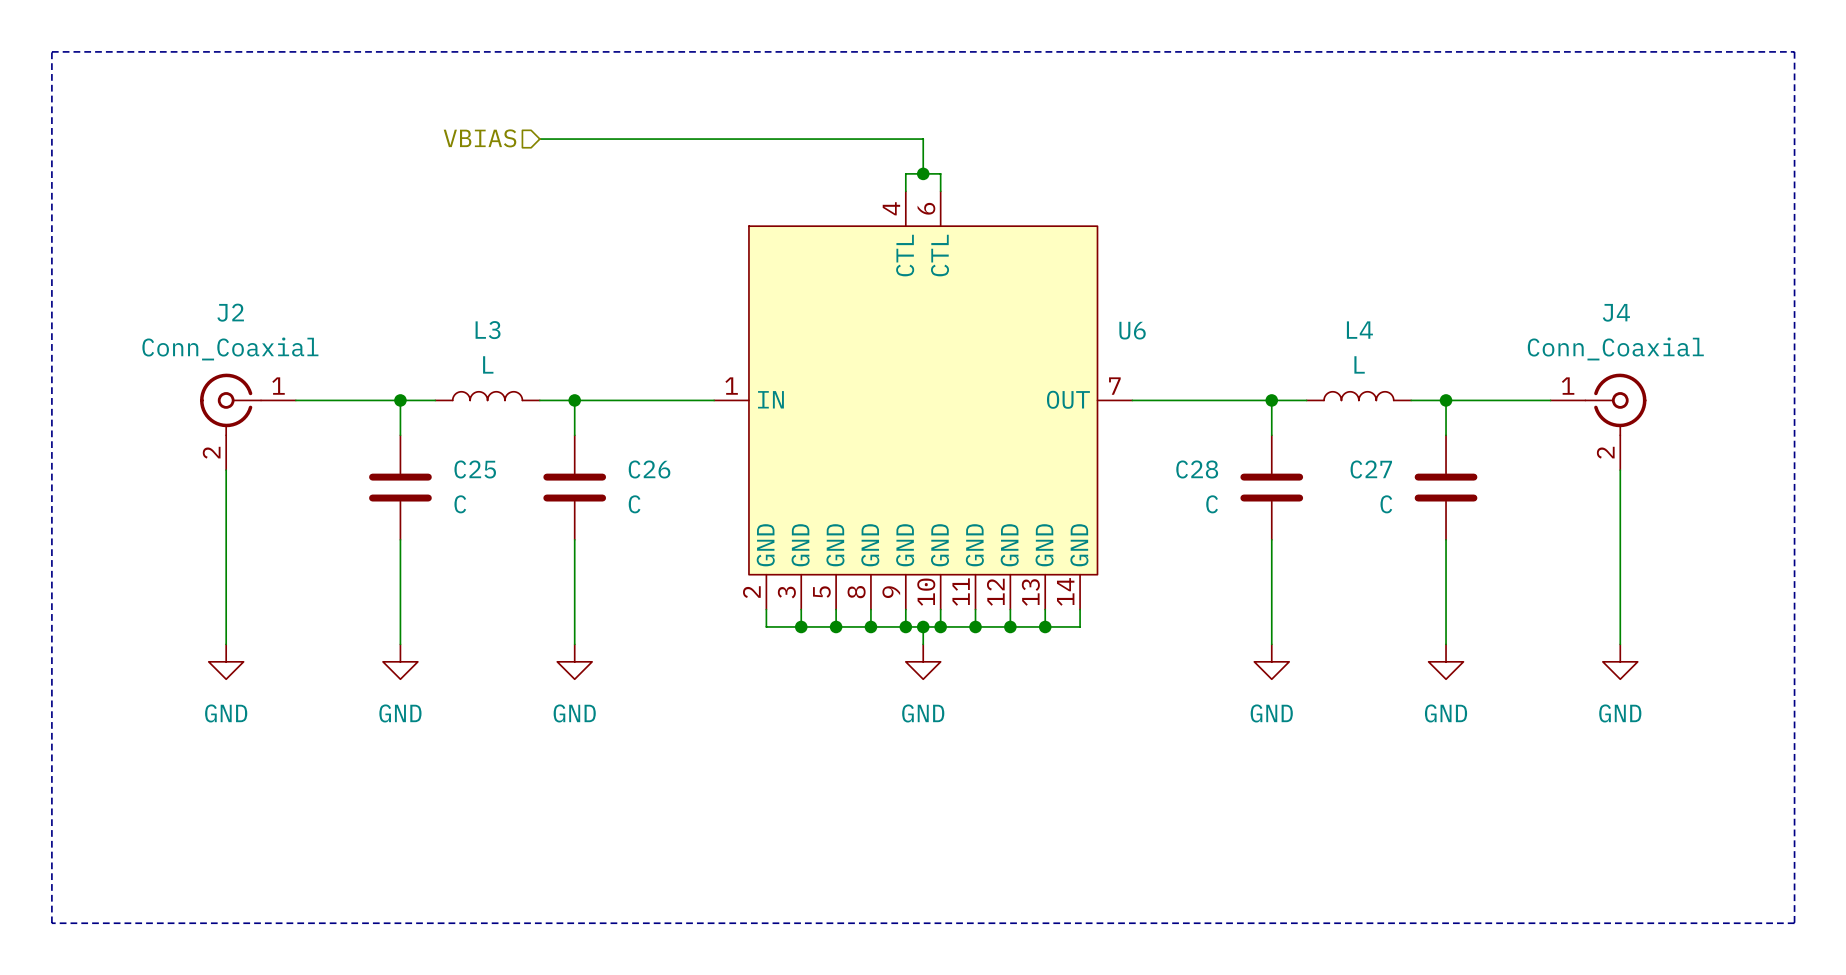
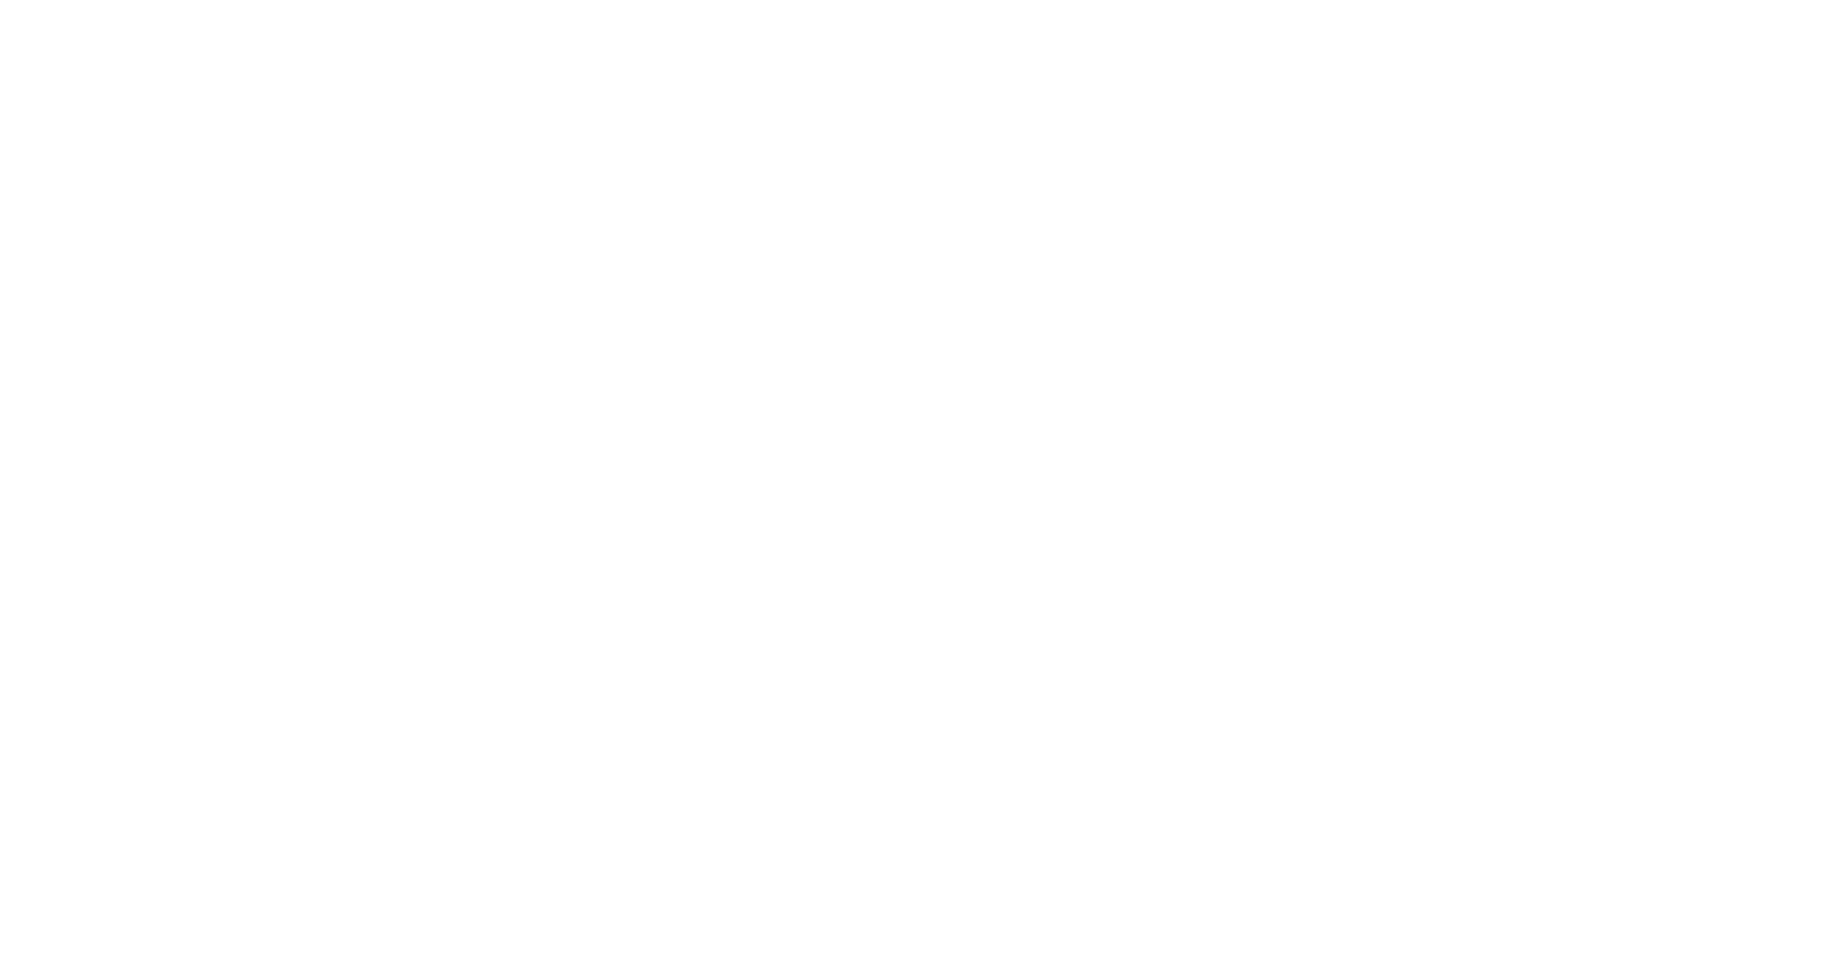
line: (51, 51) (1794, 51) (1794, 923) (51, 923) (51, 51) -> none
hierarchical label: VBIAS (479, 138) -> none
wire: (539, 139) (923, 139) (923, 173) -> none
junction: (923, 173) -> none
wire: (905, 191) (905, 173) (940, 173) (940, 191) -> none
L3: L (487, 396) -> none
L4: L (1358, 396) -> none
wire: (295, 400) (435, 400) -> none
wire: (400, 400) (400, 435) -> none
junction: (400, 400) -> none
wire: (539, 400) (714, 400) -> none
wire: (574, 400) (574, 435) -> none
junction: (574, 400) -> none
U6: (923, 400) -> none
wire: (1132, 400) (1306, 400) -> none
wire: (1271, 400) (1271, 435) -> none
junction: (1271, 400) -> none
wire: (1411, 400) (1550, 400) -> none
wire: (1446, 400) (1446, 435) -> none
junction: (1446, 400) -> none
J2: Conn_Coaxial (247, 421) -> none
J4: Conn_Coaxial (1598, 421) -> none
wire: (226, 470) (226, 644) -> none
wire: (1620, 470) (1620, 644) -> none
C25: C (400, 487) -> none
C26: C (574, 487) -> none
C28: C (1271, 487) -> none
C27: C (1446, 487) -> none
wire: (400, 539) (400, 644) -> none
wire: (574, 539) (574, 644) -> none
wire: (1271, 539) (1271, 644) -> none
wire: (1446, 539) (1446, 644) -> none
wire: (766, 609) (766, 626) (1080, 626) (1080, 609) -> none
wire: (801, 609) (801, 626) -> none
wire: (836, 609) (836, 626) -> none
wire: (870, 609) (870, 626) -> none
wire: (905, 609) (905, 626) -> none
wire: (940, 609) (940, 626) -> none
wire: (975, 609) (975, 626) -> none
wire: (1010, 609) (1010, 626) -> none
wire: (1045, 609) (1045, 626) -> none
junction: (801, 626) -> none
junction: (836, 626) -> none
junction: (870, 626) -> none
junction: (905, 626) -> none
wire: (923, 626) (923, 644) -> none
junction: (923, 626) -> none
junction: (940, 626) -> none
junction: (975, 626) -> none
junction: (1010, 626) -> none
junction: (1045, 626) -> none
power symbol: GND (226, 661) -> none
power symbol: GND (400, 661) -> none
power symbol: GND (574, 661) -> none
power symbol: GND (923, 661) -> none
power symbol: GND (1271, 661) -> none
power symbol: GND (1446, 661) -> none
power symbol: GND (1620, 661) -> none

